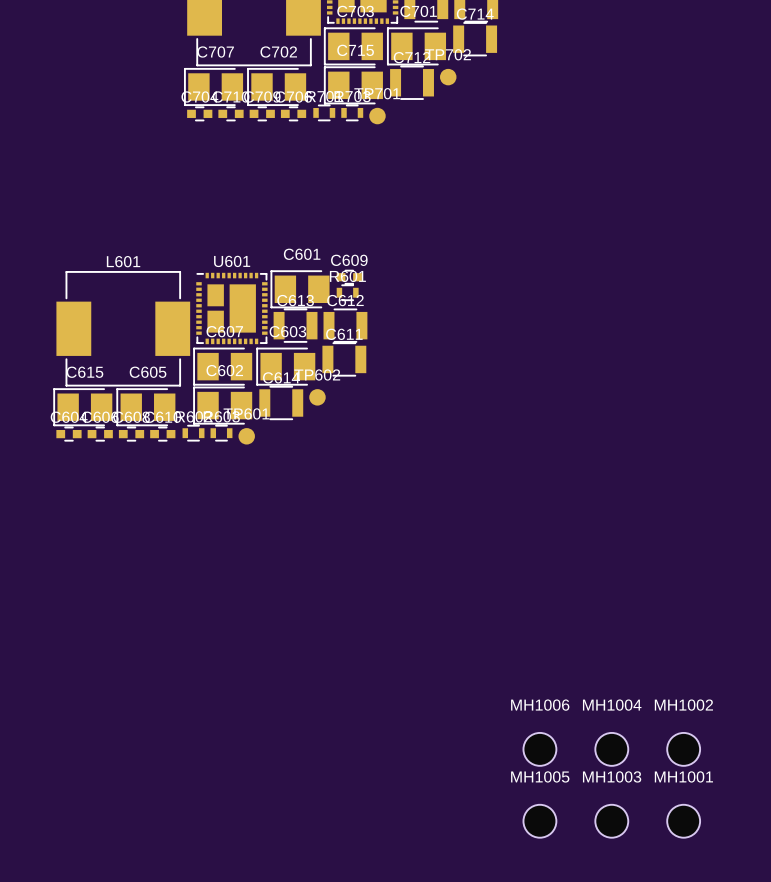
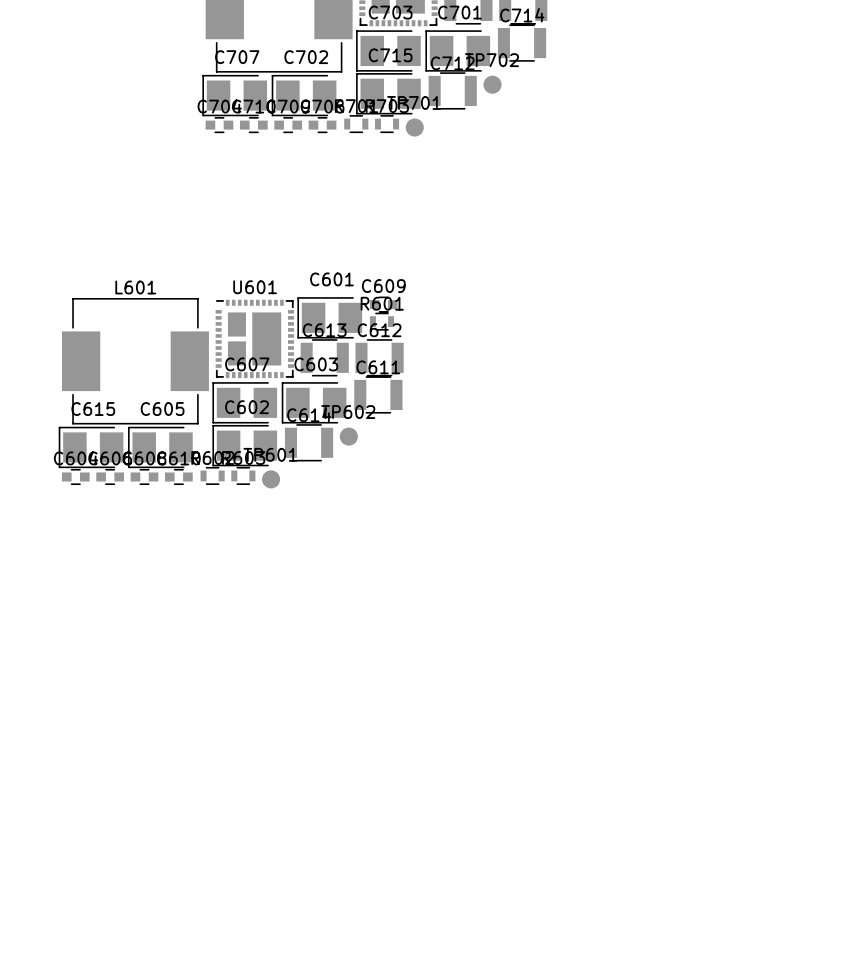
MH1006: (539, 749) -> none
MH1004: (611, 749) -> none
MH1002: (683, 749) -> none
MH1005: (539, 821) -> none
MH1003: (611, 821) -> none
MH1001: (683, 821) -> none

